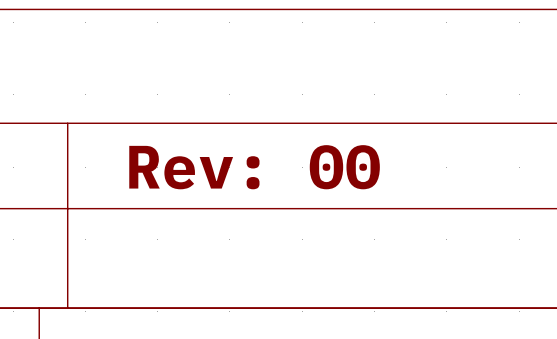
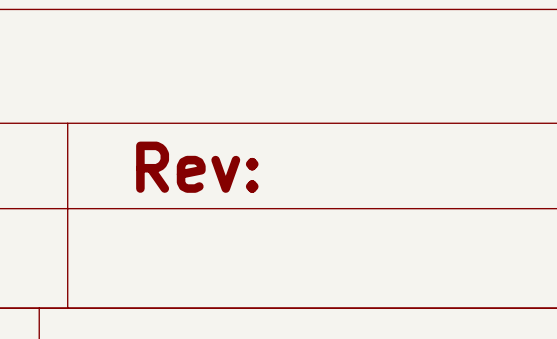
title block: Rev: 00 (254, 167) -> Rev: (197, 167)

